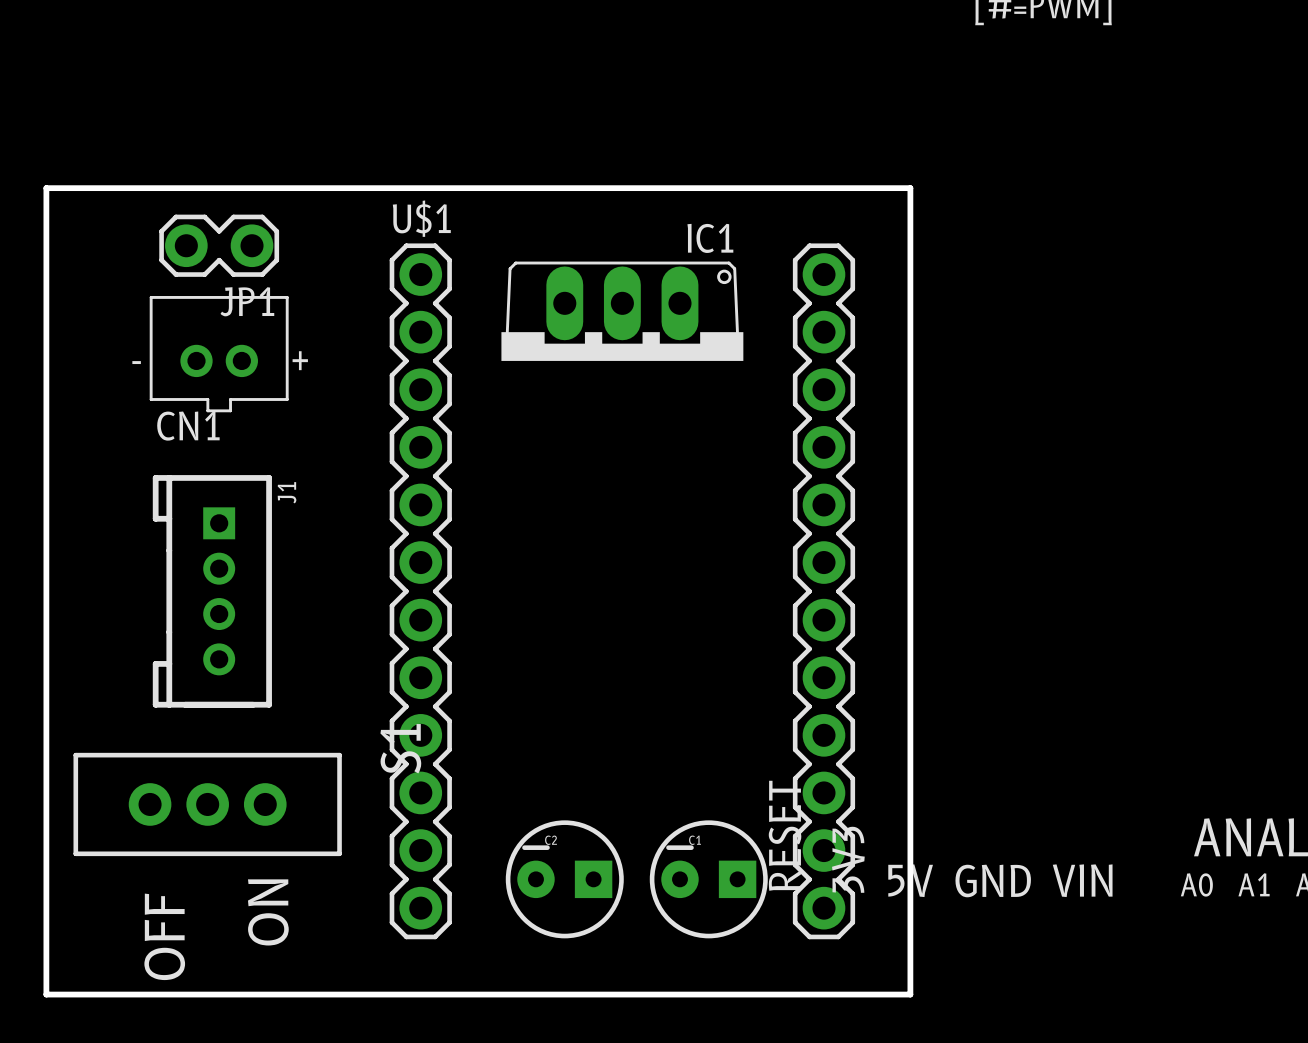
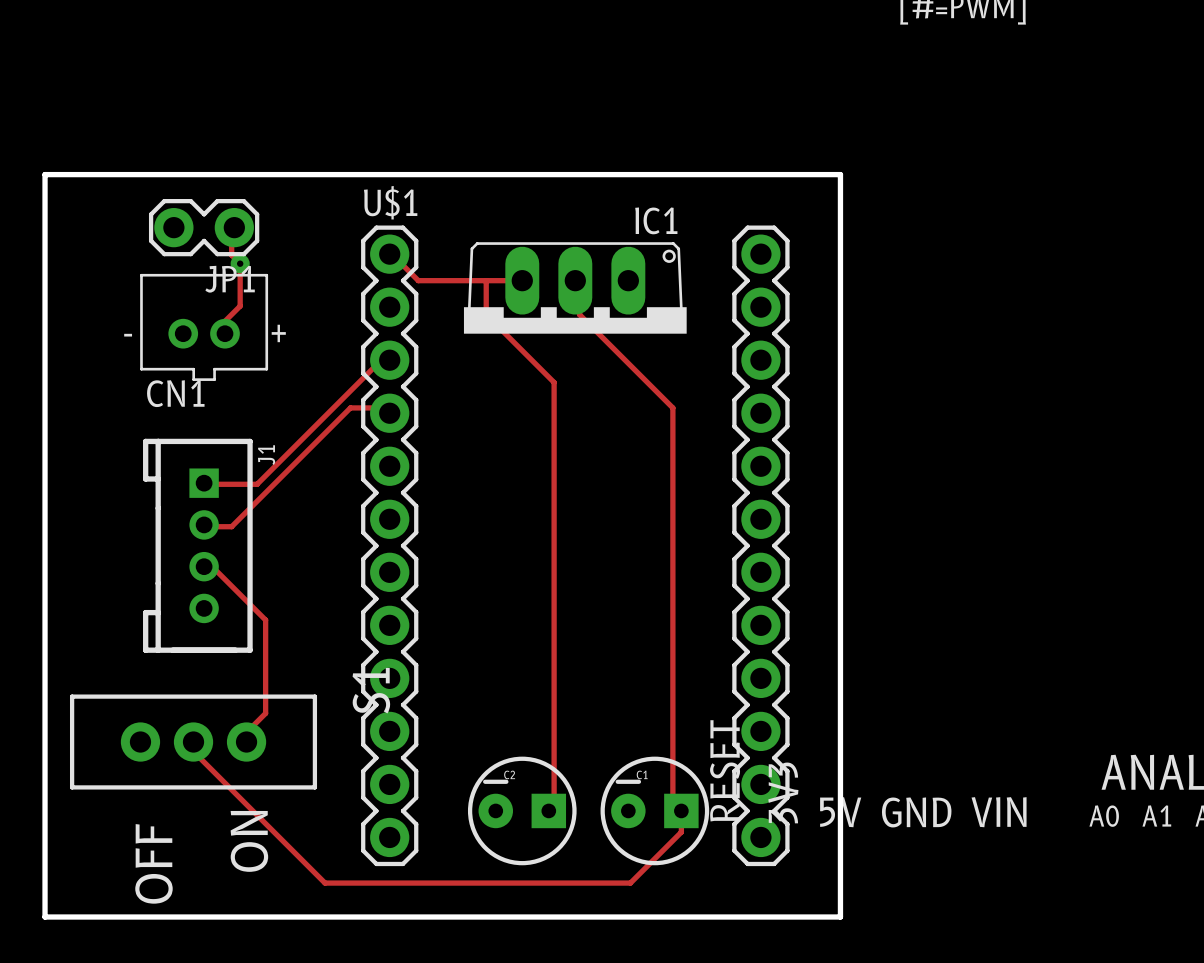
track: none -> (234, 227) (231, 229) (231, 255) (240, 263) (240, 306) (223, 323) (224, 333)
track: none -> (389, 254) (418, 280) (522, 280)
via: none -> (240, 263)
track: none -> (486, 280) (486, 314) (554, 382) (554, 806) (548, 810)
track: none -> (575, 280) (579, 280) (579, 314) (672, 407) (672, 798) (681, 806) (681, 832) (630, 883) (325, 883) (197, 755) (197, 747) (193, 742)
track: none -> (389, 360) (384, 357) (257, 484) (204, 483)
track: none -> (389, 413) (384, 407) (350, 407) (231, 526) (206, 526) (204, 524)
track: none -> (204, 566) (206, 569) (214, 569) (265, 620) (265, 713) (240, 738) (246, 742)

